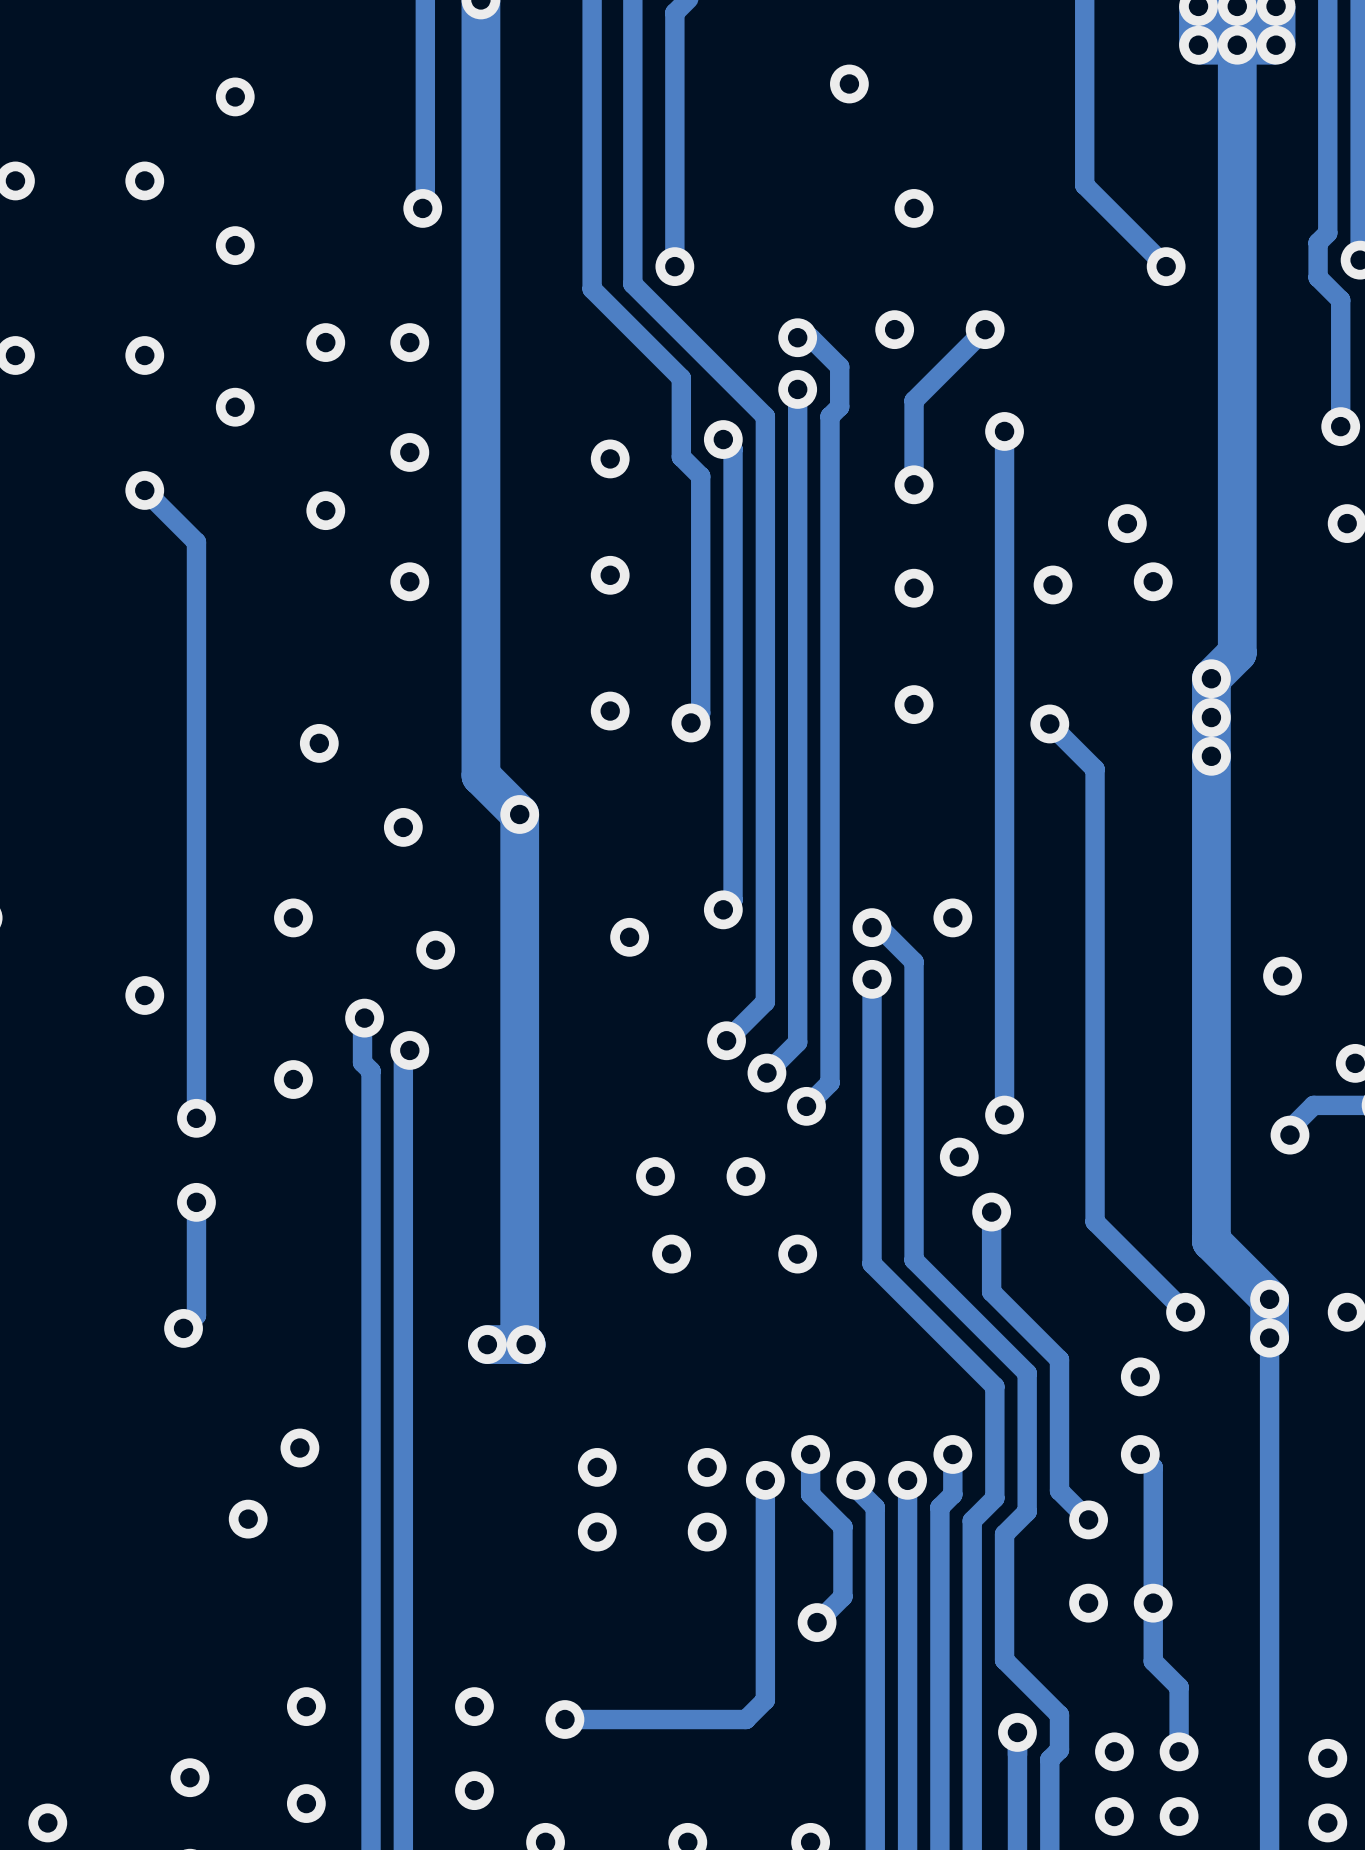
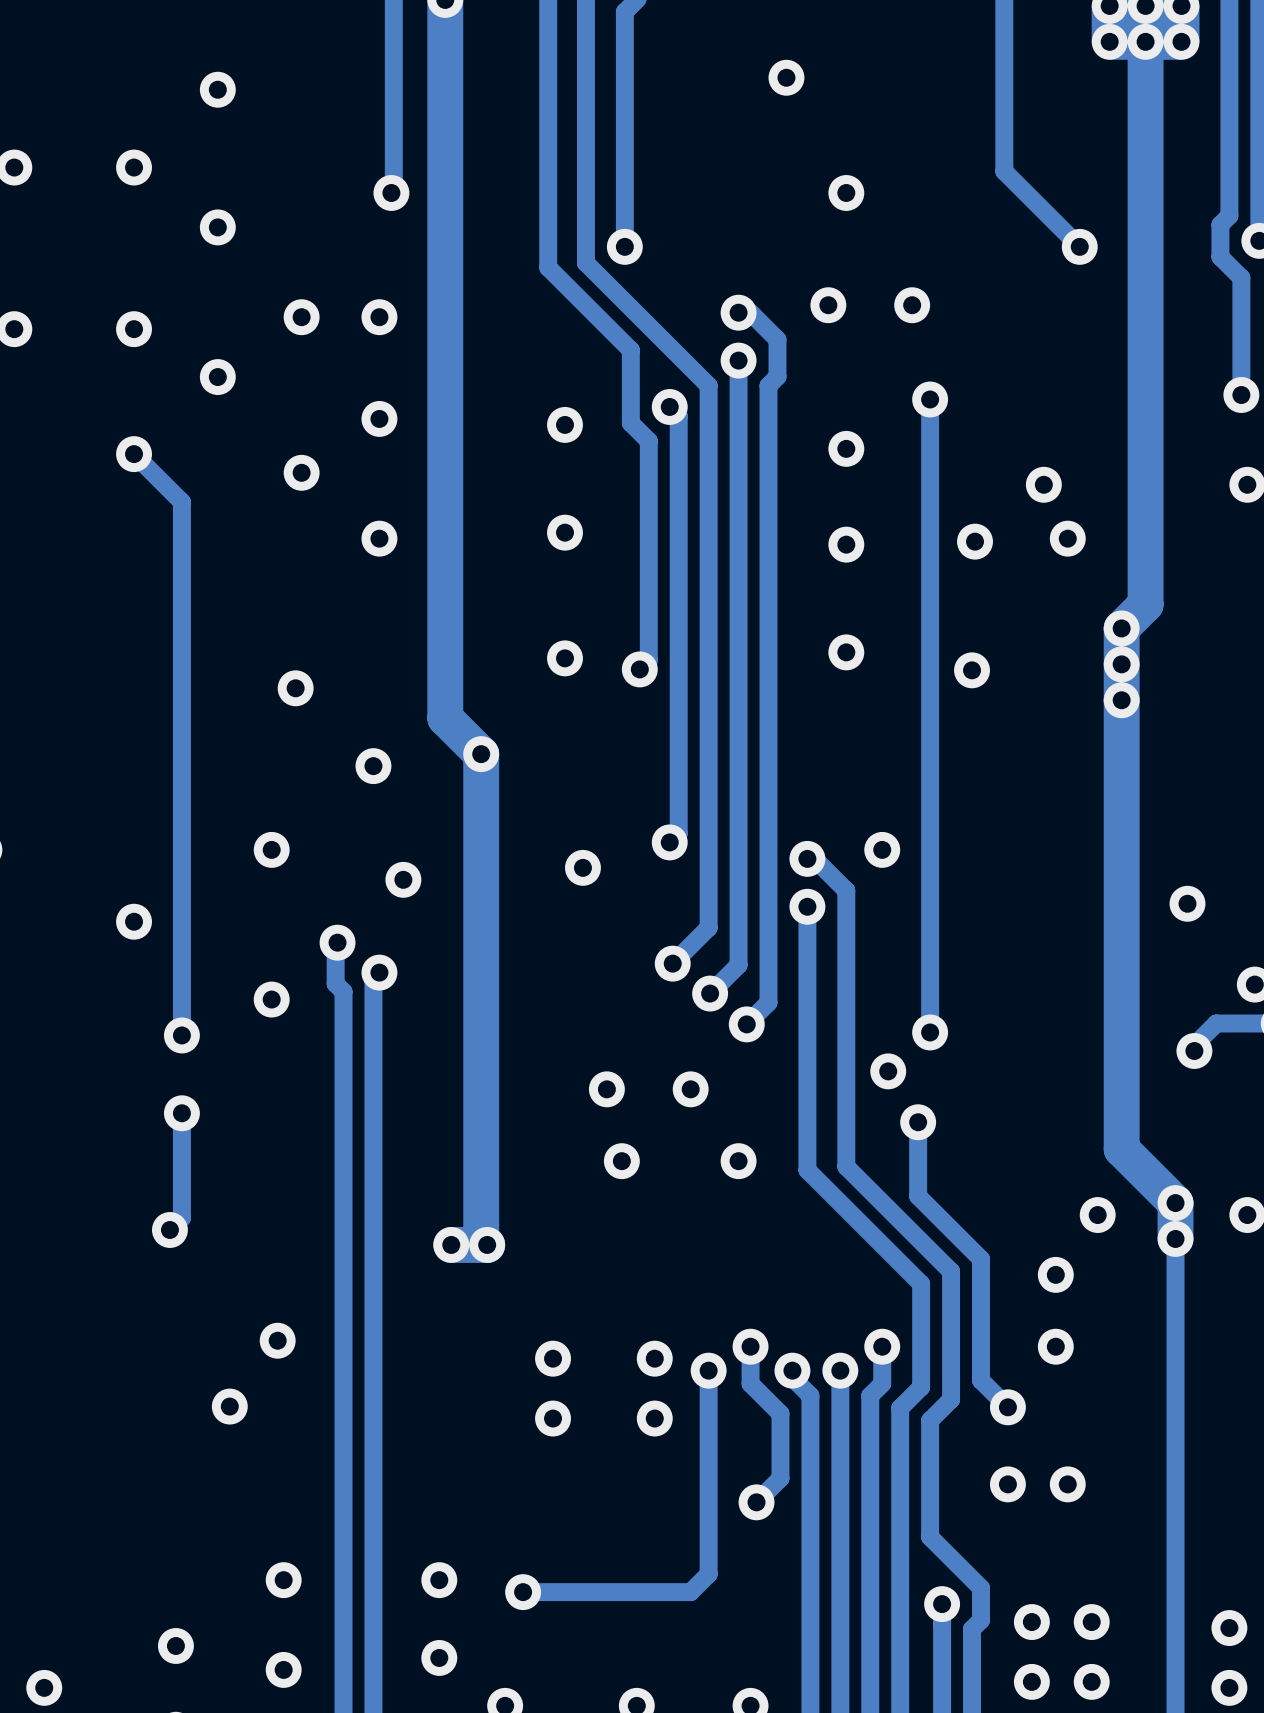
track: (985, 329) (914, 400) (914, 484) -> none
track: (1049, 723) (1095, 769) (1095, 1221) (1185, 1312) -> none
track: (1140, 1454) (1153, 1467) (1153, 1661) (1179, 1687) (1179, 1751) -> none

